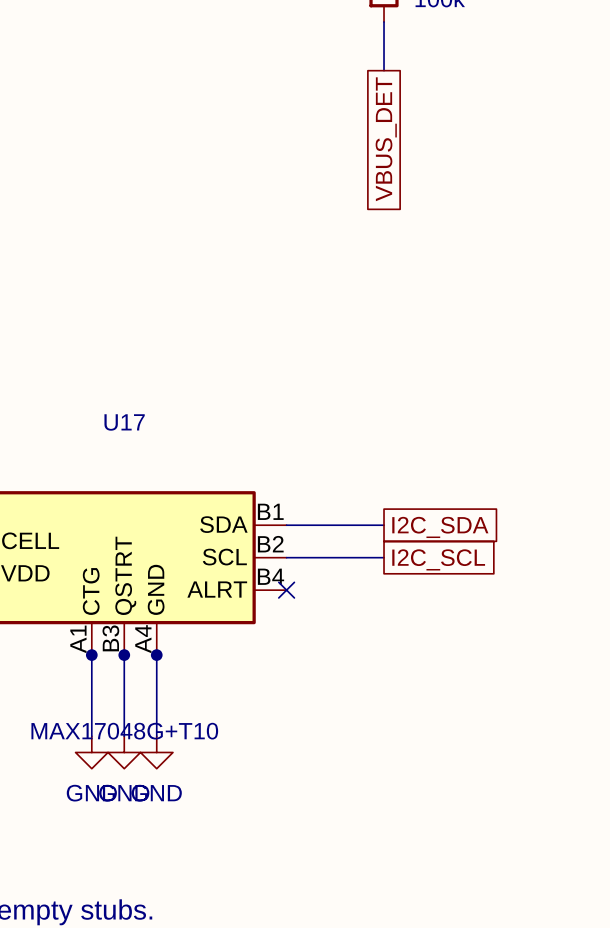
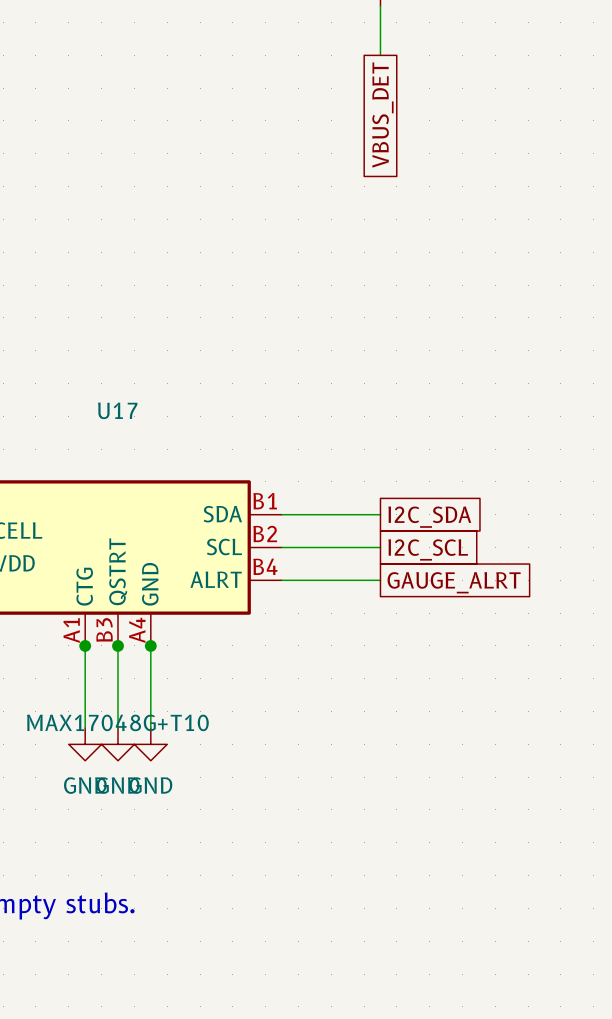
wire: none -> (282, 580) (380, 580)
no-connect mark: (286, 590) -> none
global label: none -> GAUGE_ALRT (454, 582)

